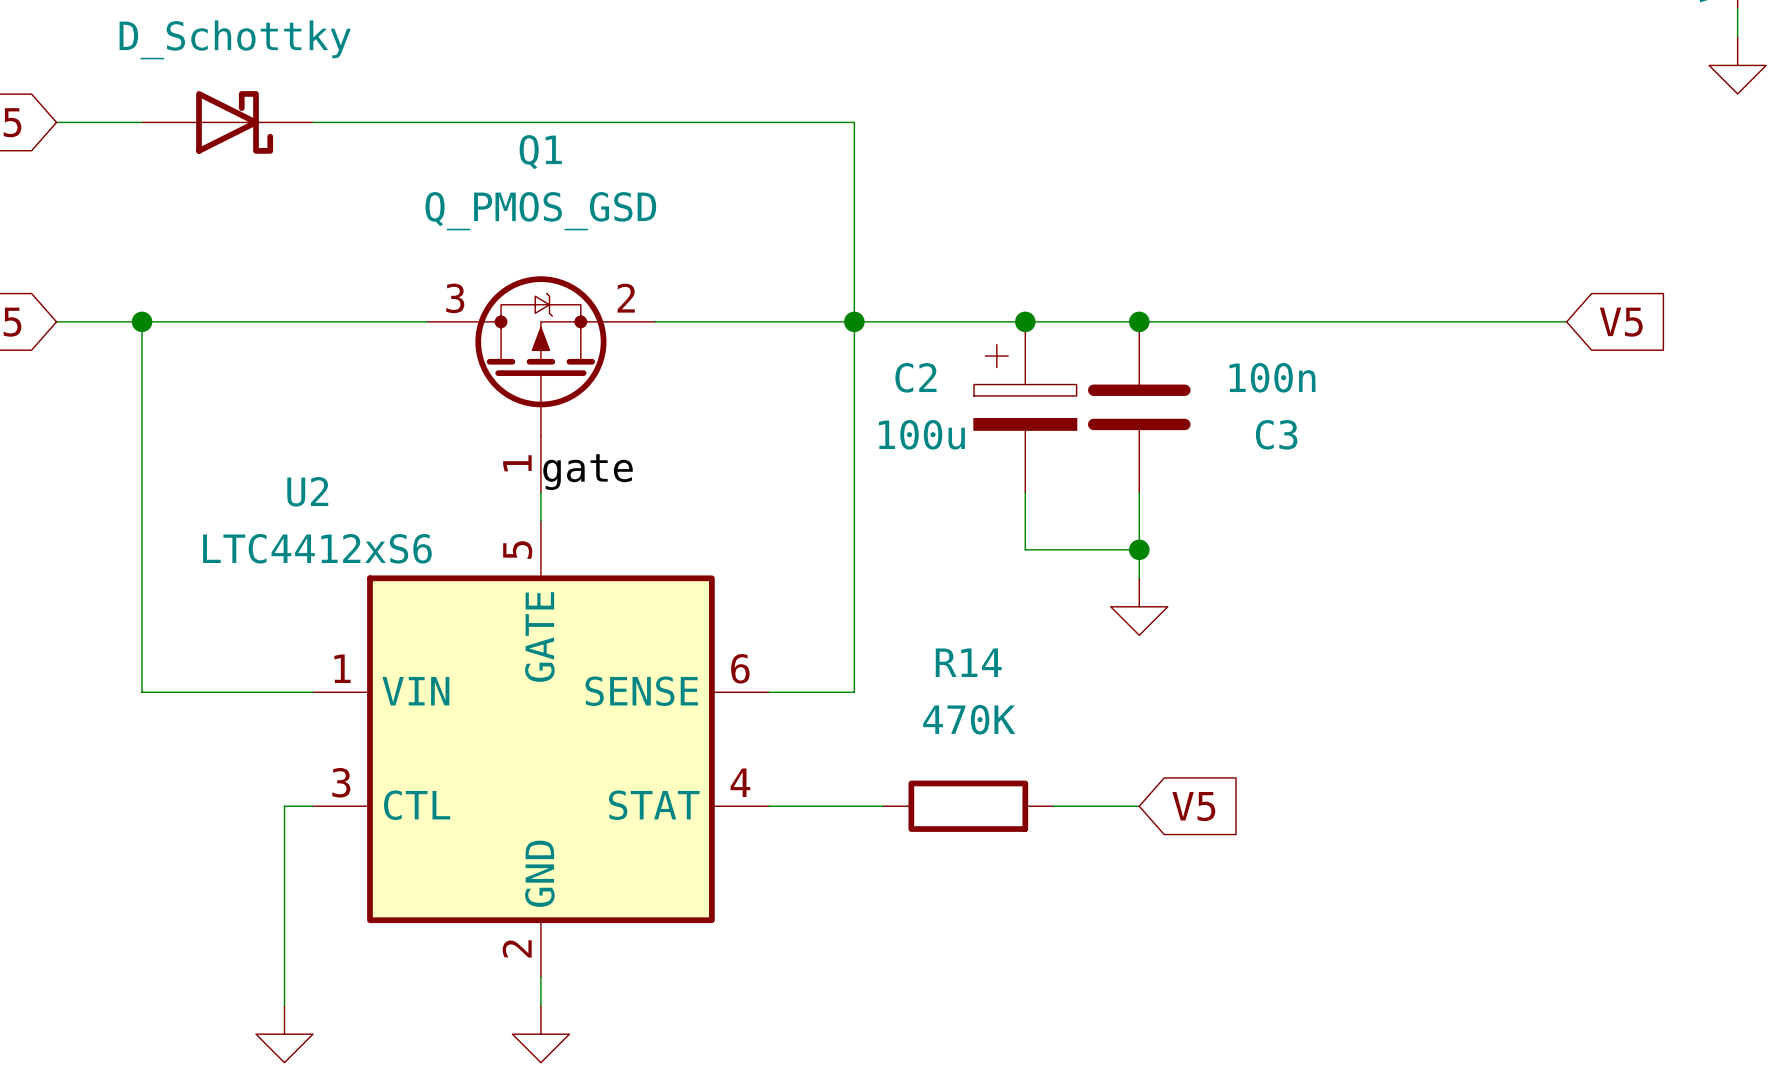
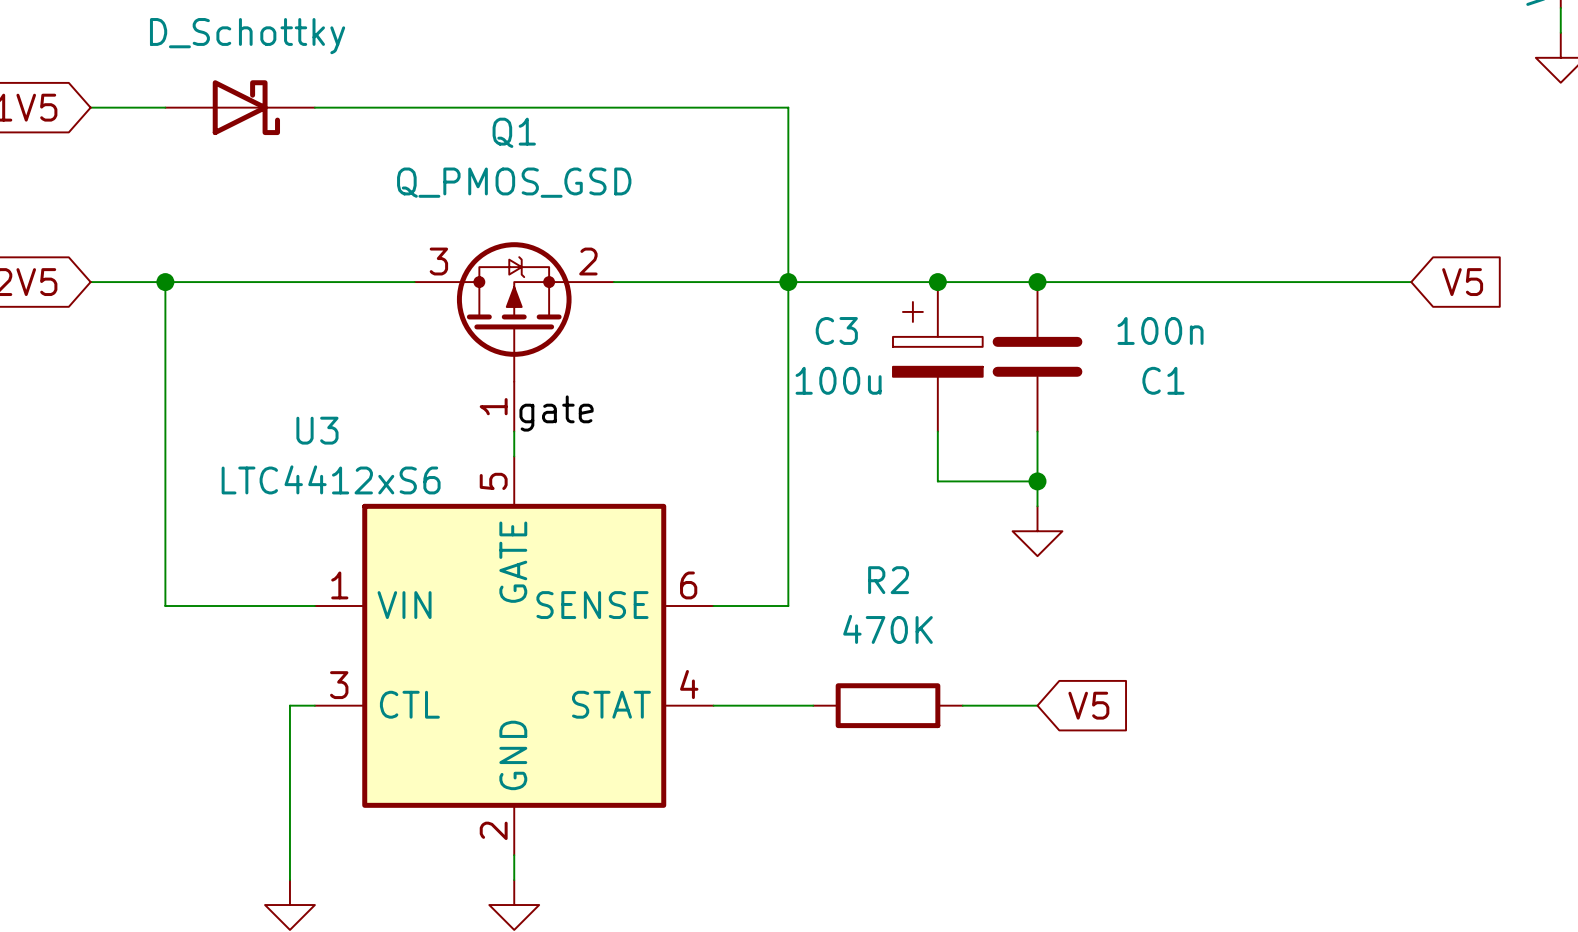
C2 name: C2 (915, 377) -> C3 (836, 330)
C3 name: C3 (1276, 434) -> C1 (1163, 380)
U2 name: U2 (307, 491) -> U3 (317, 430)
R14 name: R14 (968, 662) -> R2 (888, 580)

